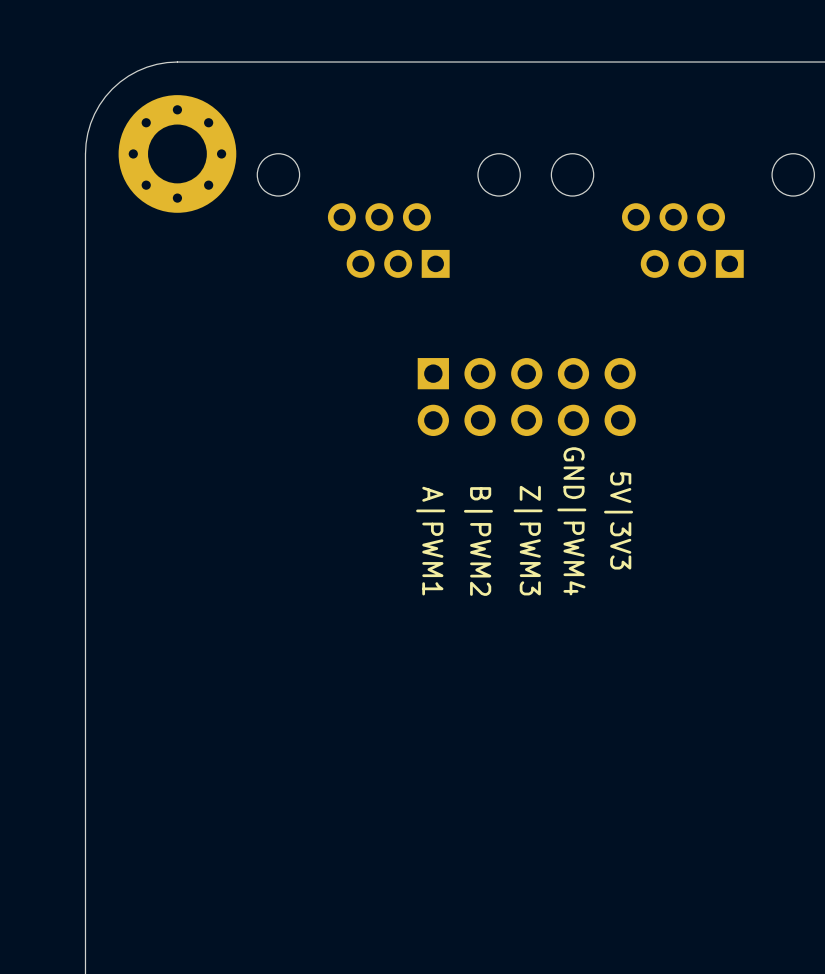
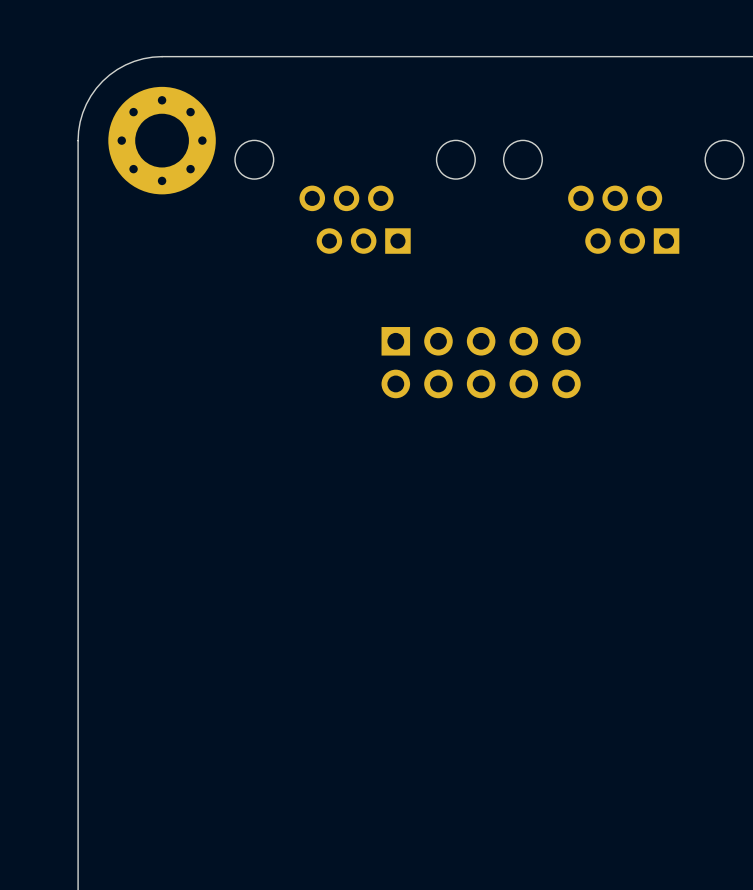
text: 5V|3V3 (618, 520) -> none
text: GND|PWM4 (571, 521) -> none
text: Z|PWM3 (528, 540) -> none
text: A|PWM1 (430, 541) -> none
text: B|PWM2 (478, 541) -> none

